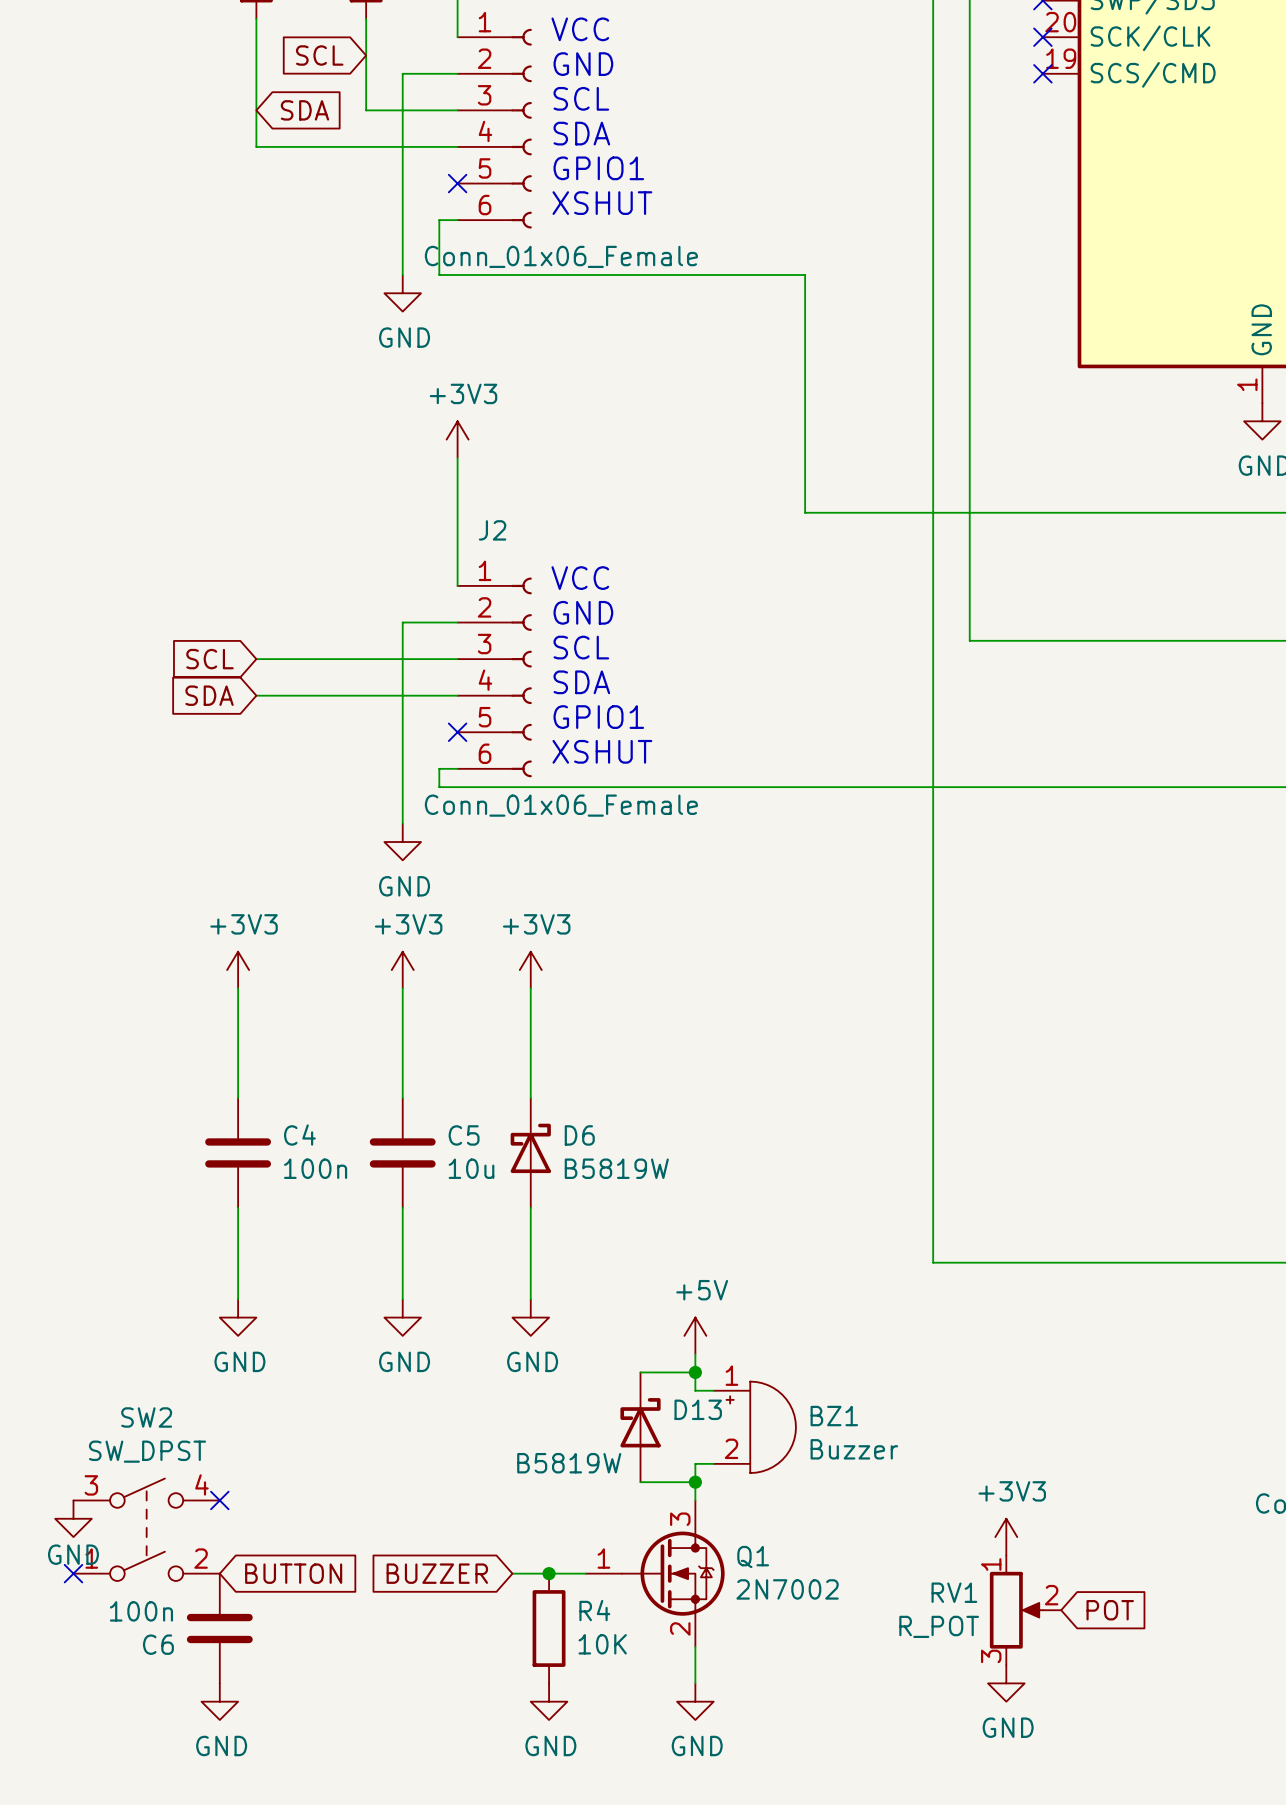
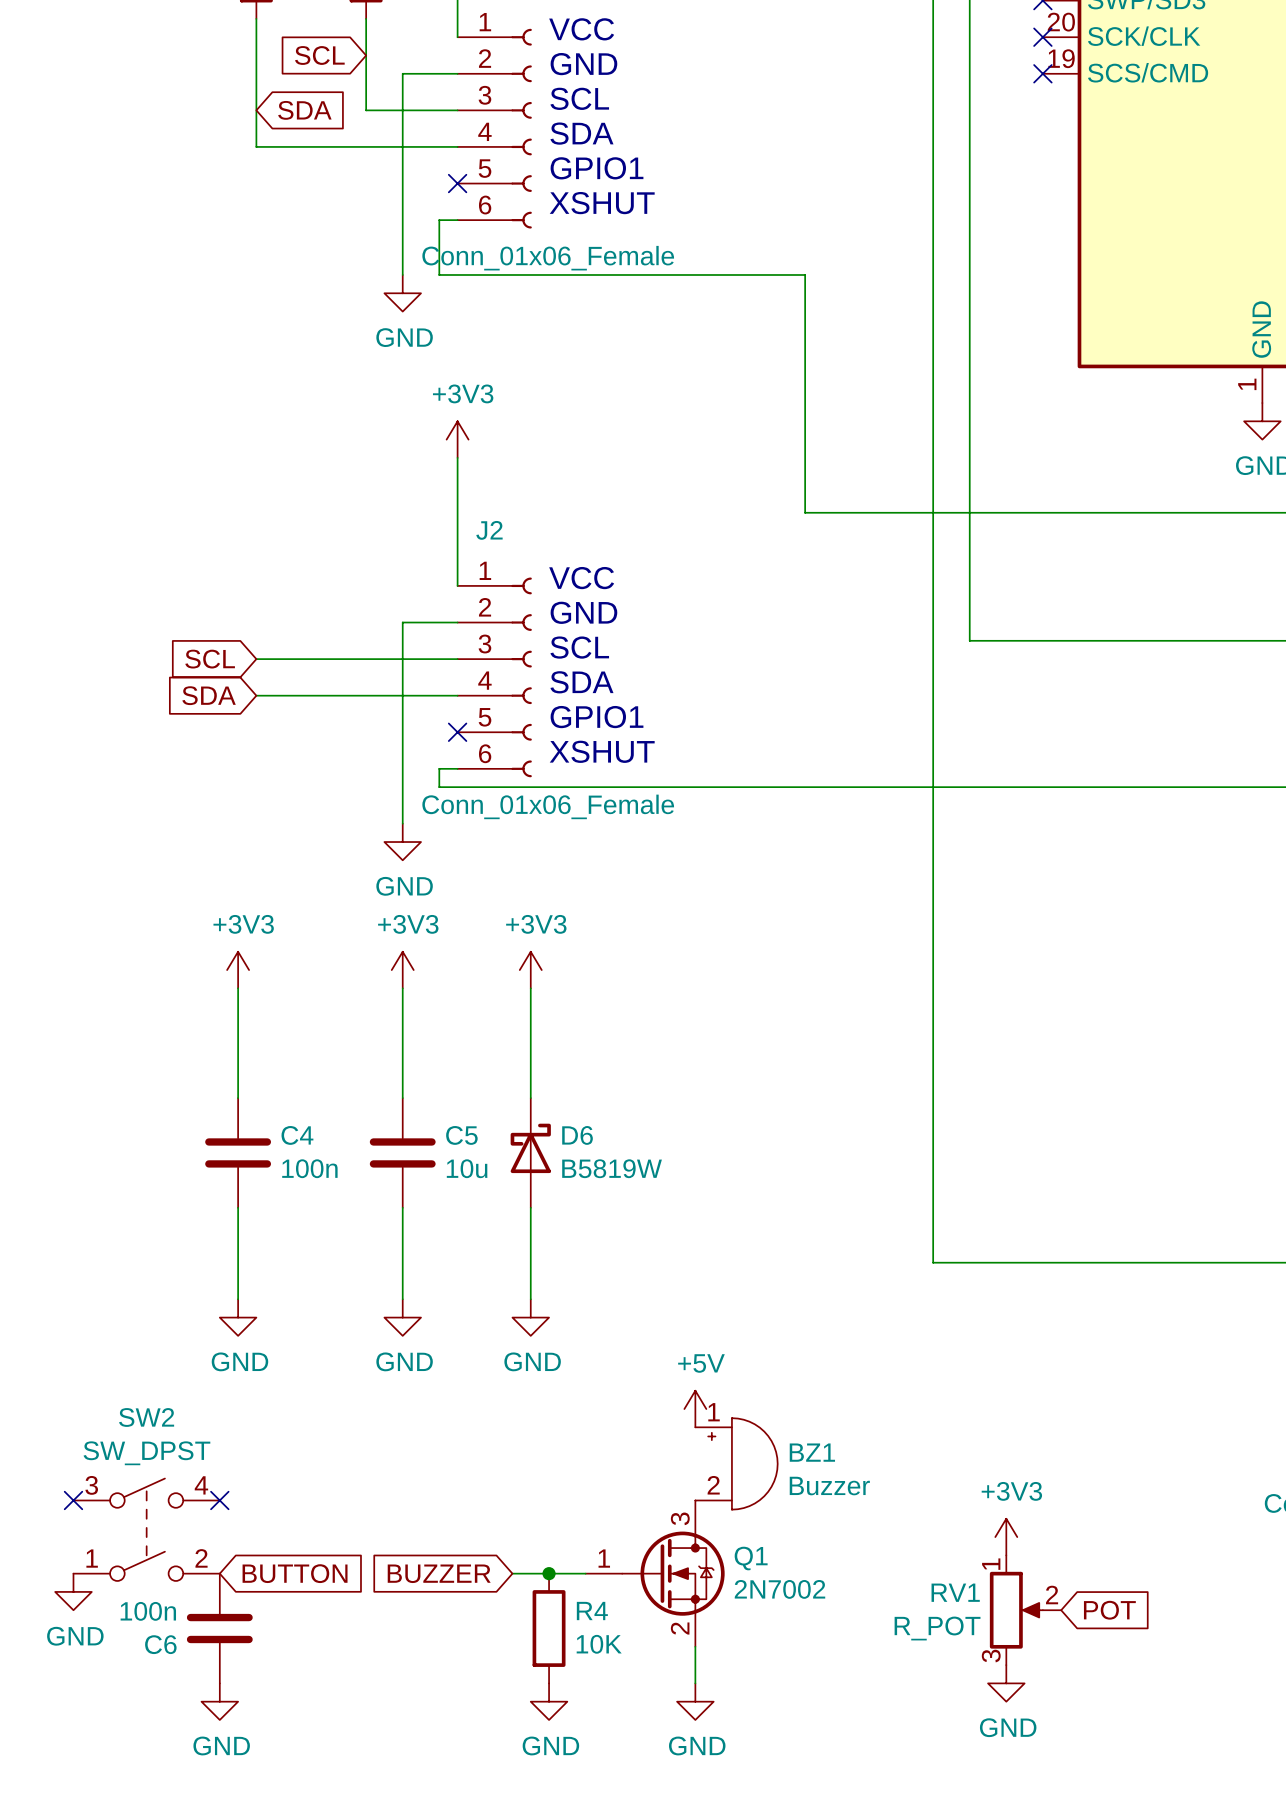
power symbol position: +5V (695, 1335) -> +5V (695, 1409)
wire: (695, 1354) (695, 1390) (713, 1390) -> none
wire: (640, 1372) (695, 1372) -> none
junction: (695, 1372) -> none
D13: B5819W (640, 1427) -> none
BZ1 position: (754, 1427) -> (736, 1463)
wire: (713, 1463) (695, 1463) (695, 1500) -> none
wire: (640, 1482) (695, 1482) -> none
junction: (695, 1482) -> none
power symbol position: GND (73, 1518) -> GND (73, 1591)
power symbol text position: GND (73, 1554) -> GND (75, 1636)
no-connect mark position: (73, 1573) -> (73, 1500)

